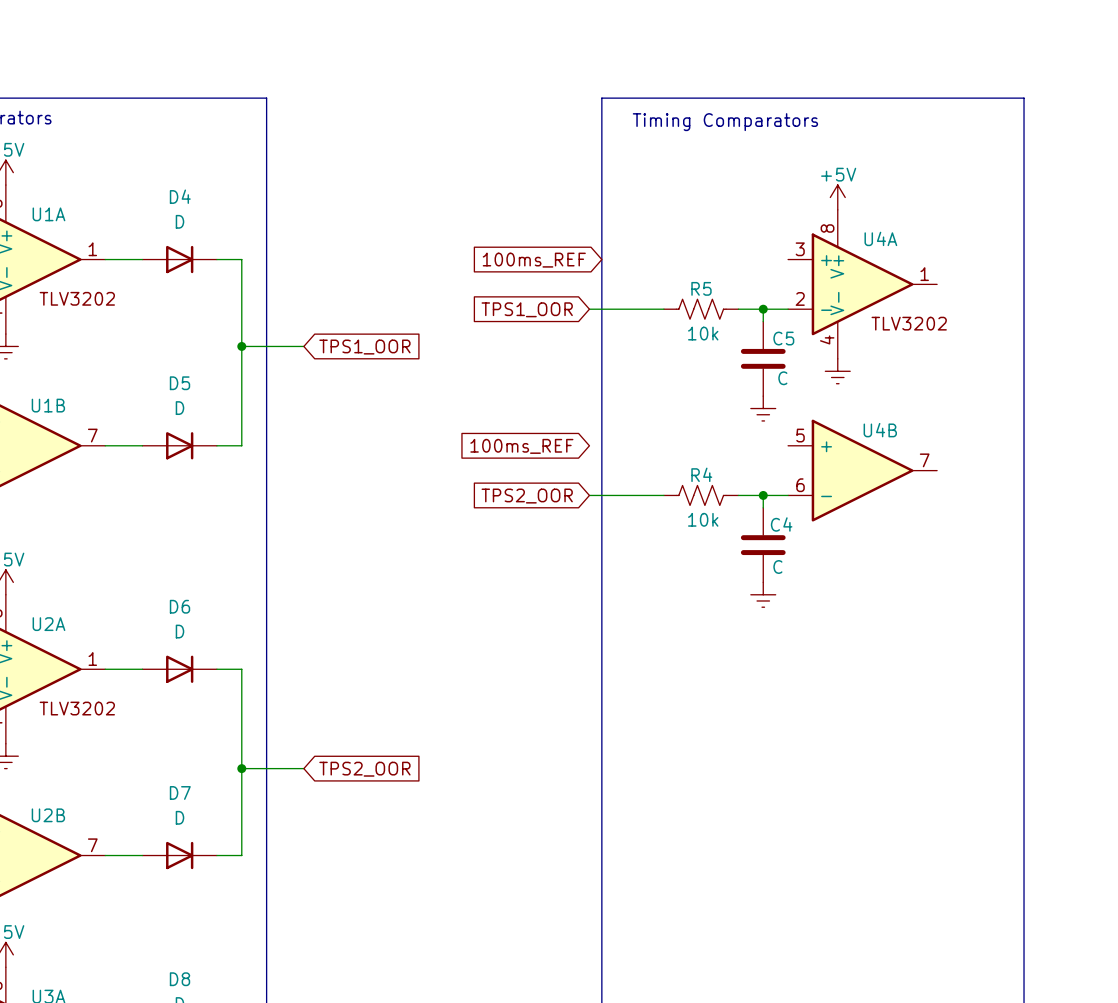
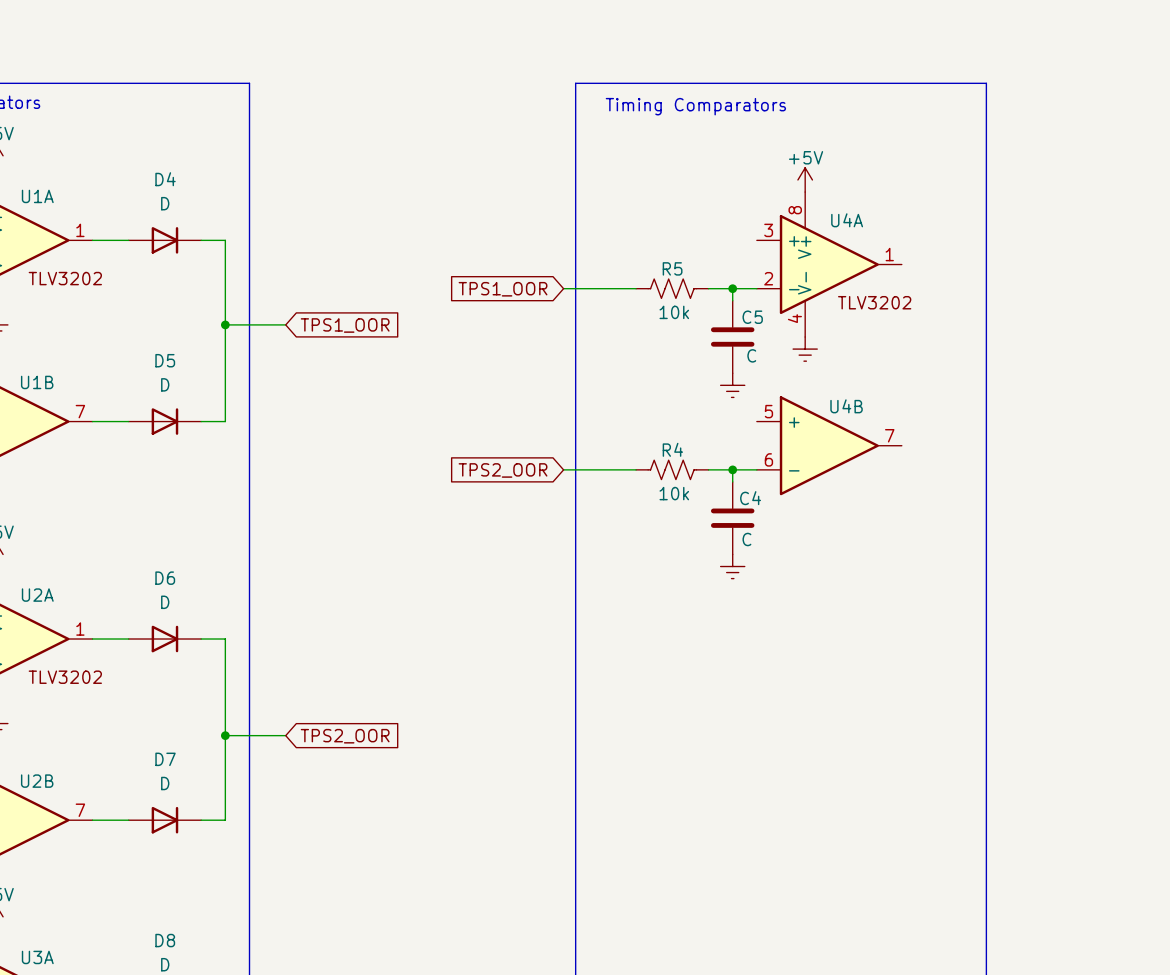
global label: 100ms_REF (534, 260) -> none
global label: 100ms_REF (521, 446) -> none

